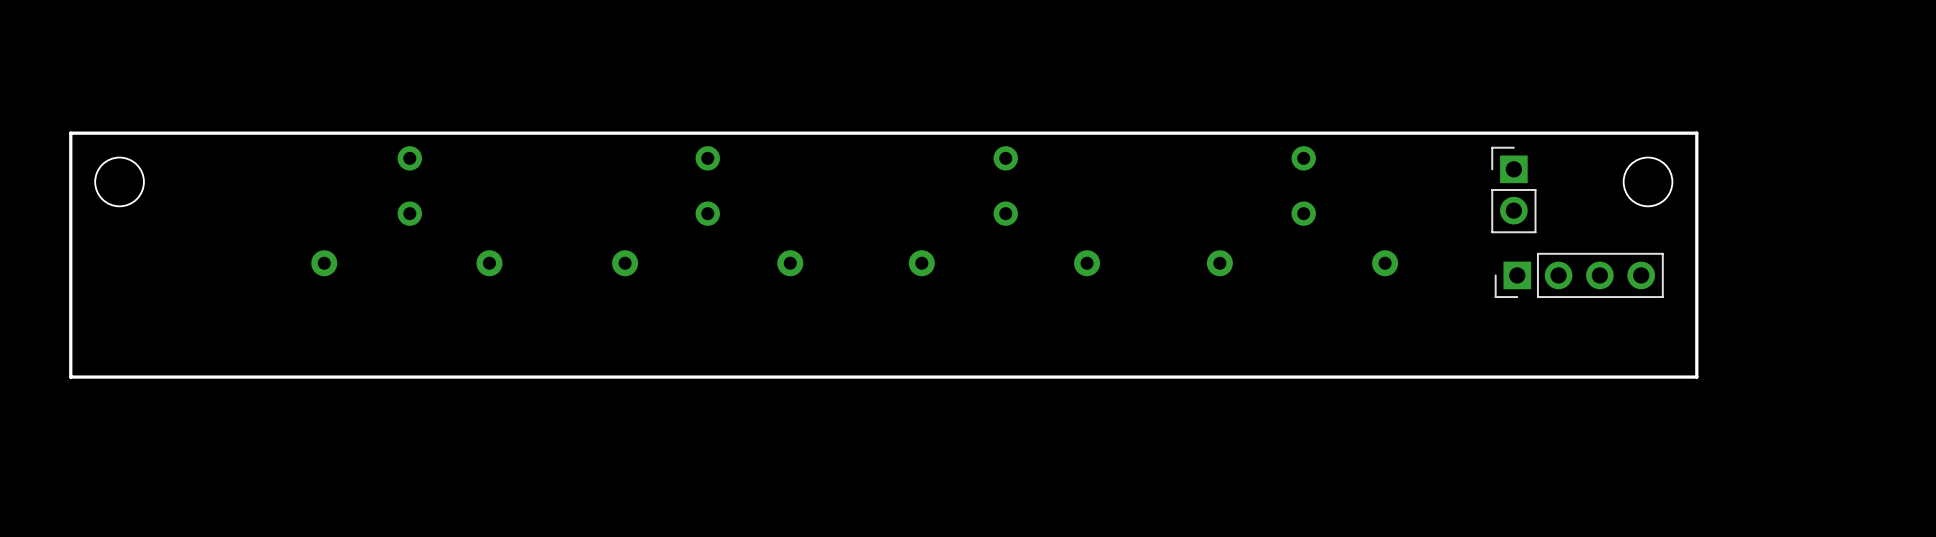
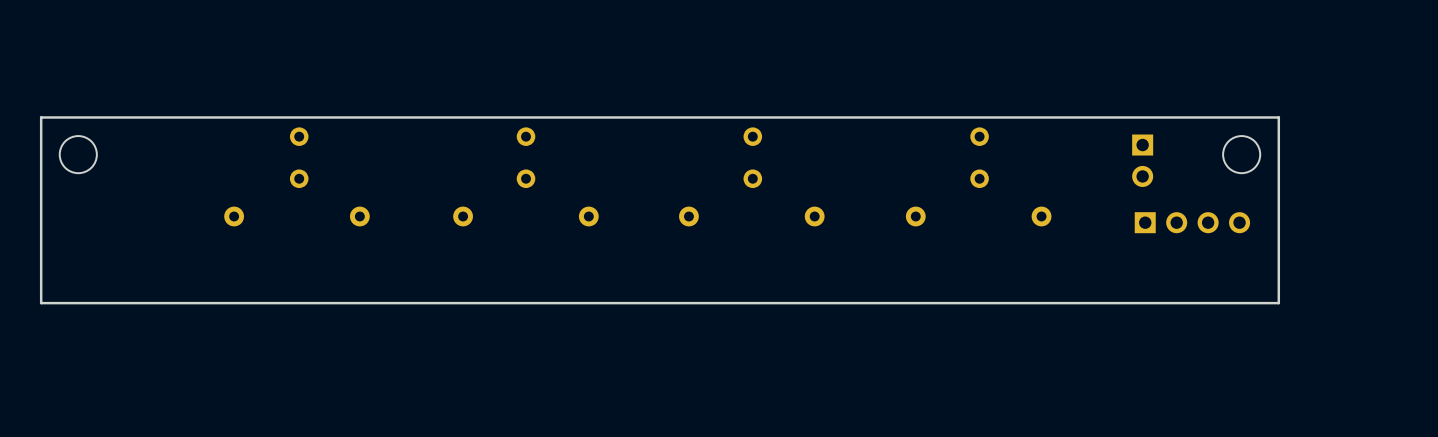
part side: bottom (1513, 189) -> top (1142, 160)
part side: bottom (1579, 275) -> top (1192, 222)

